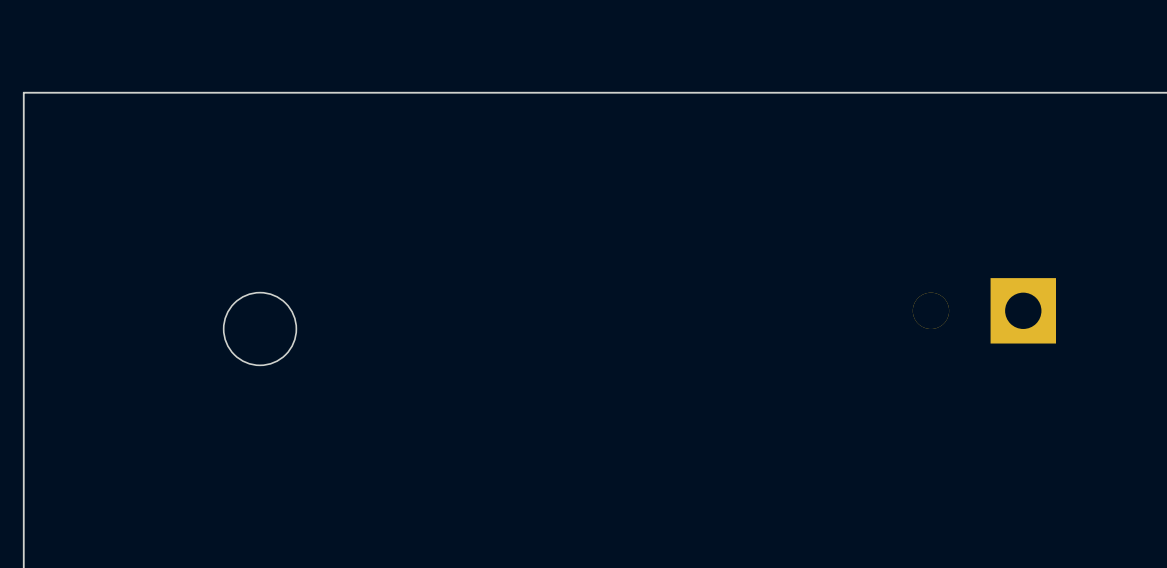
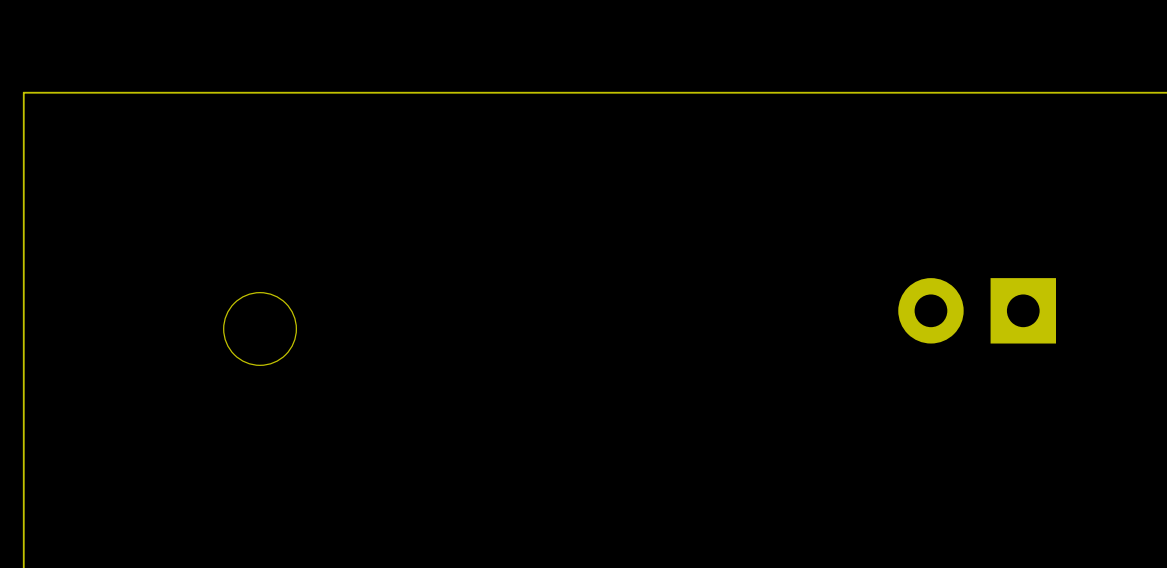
part footprint: [912, 278, 1056, 344] -> [898, 278, 1056, 344]

